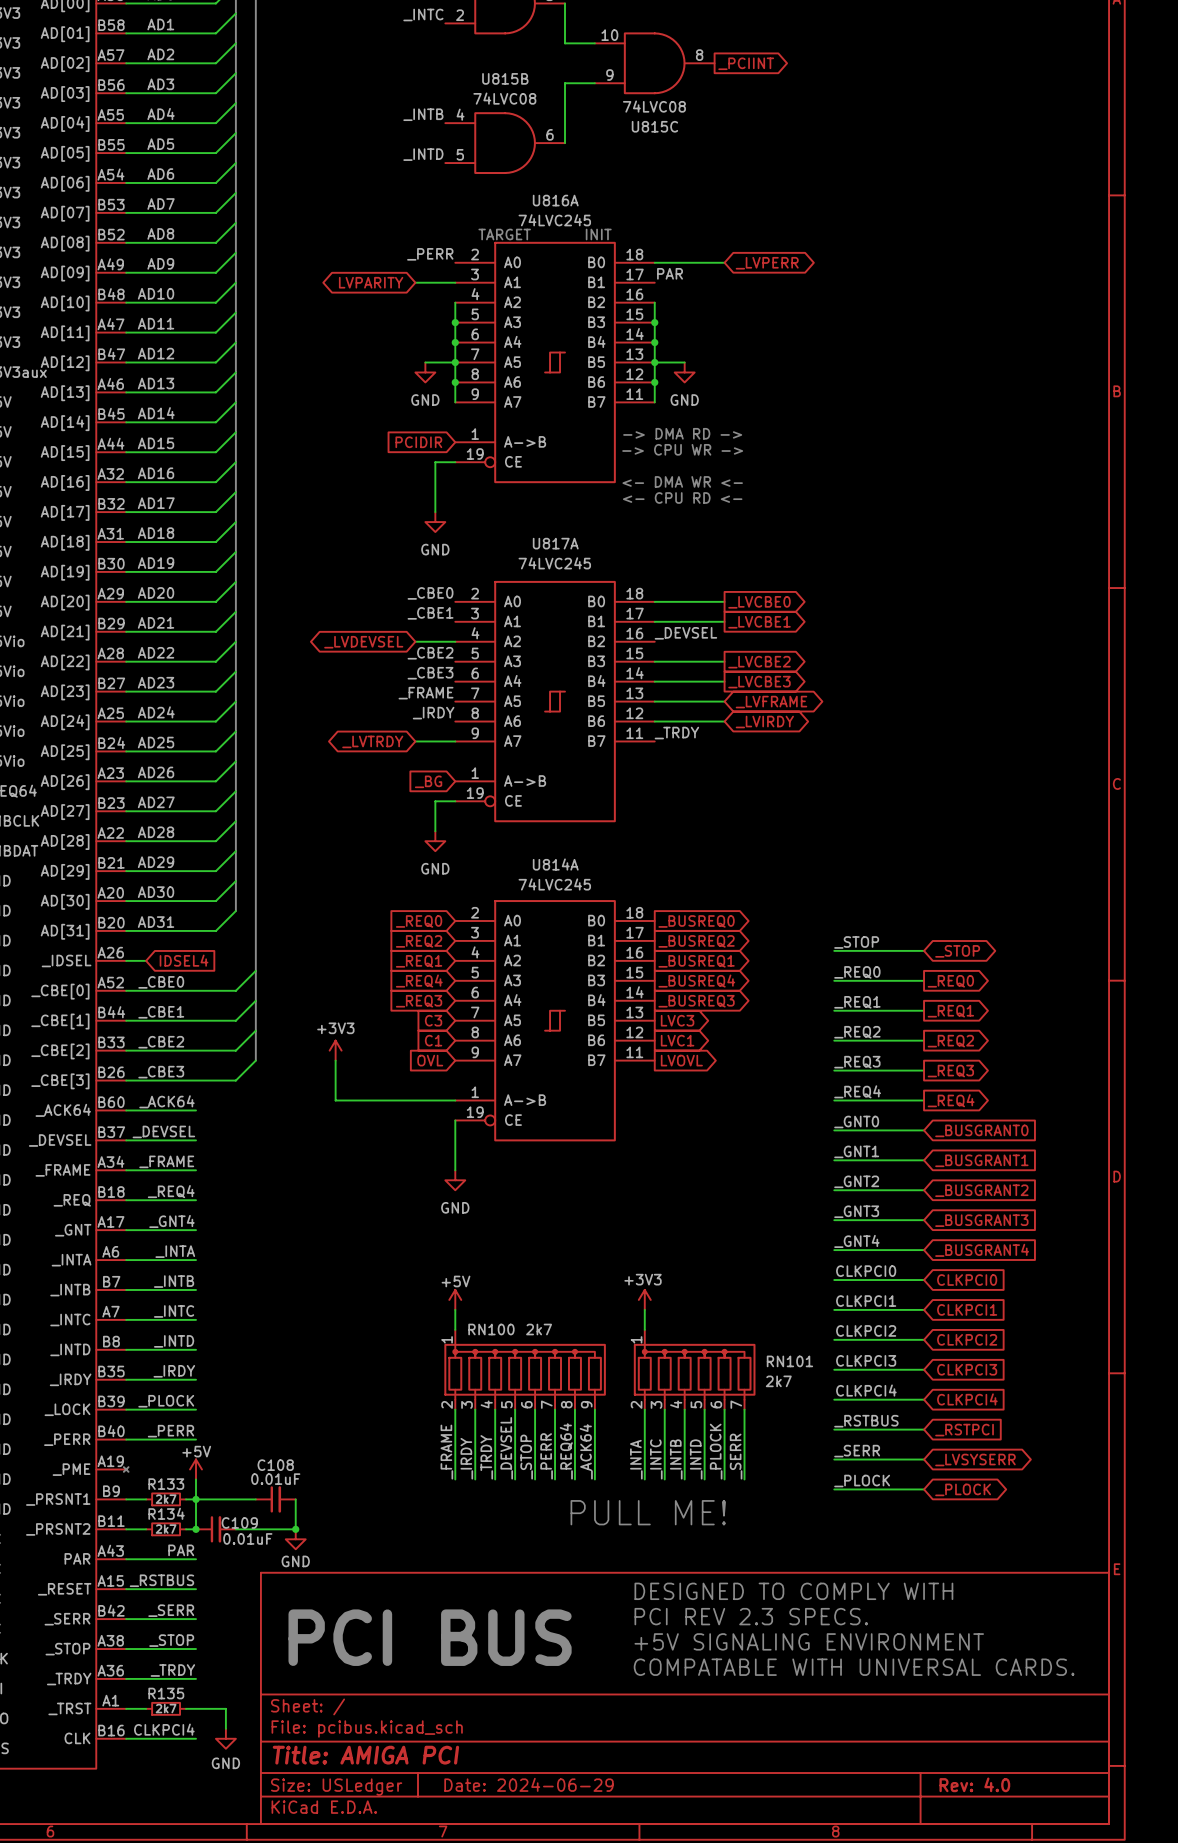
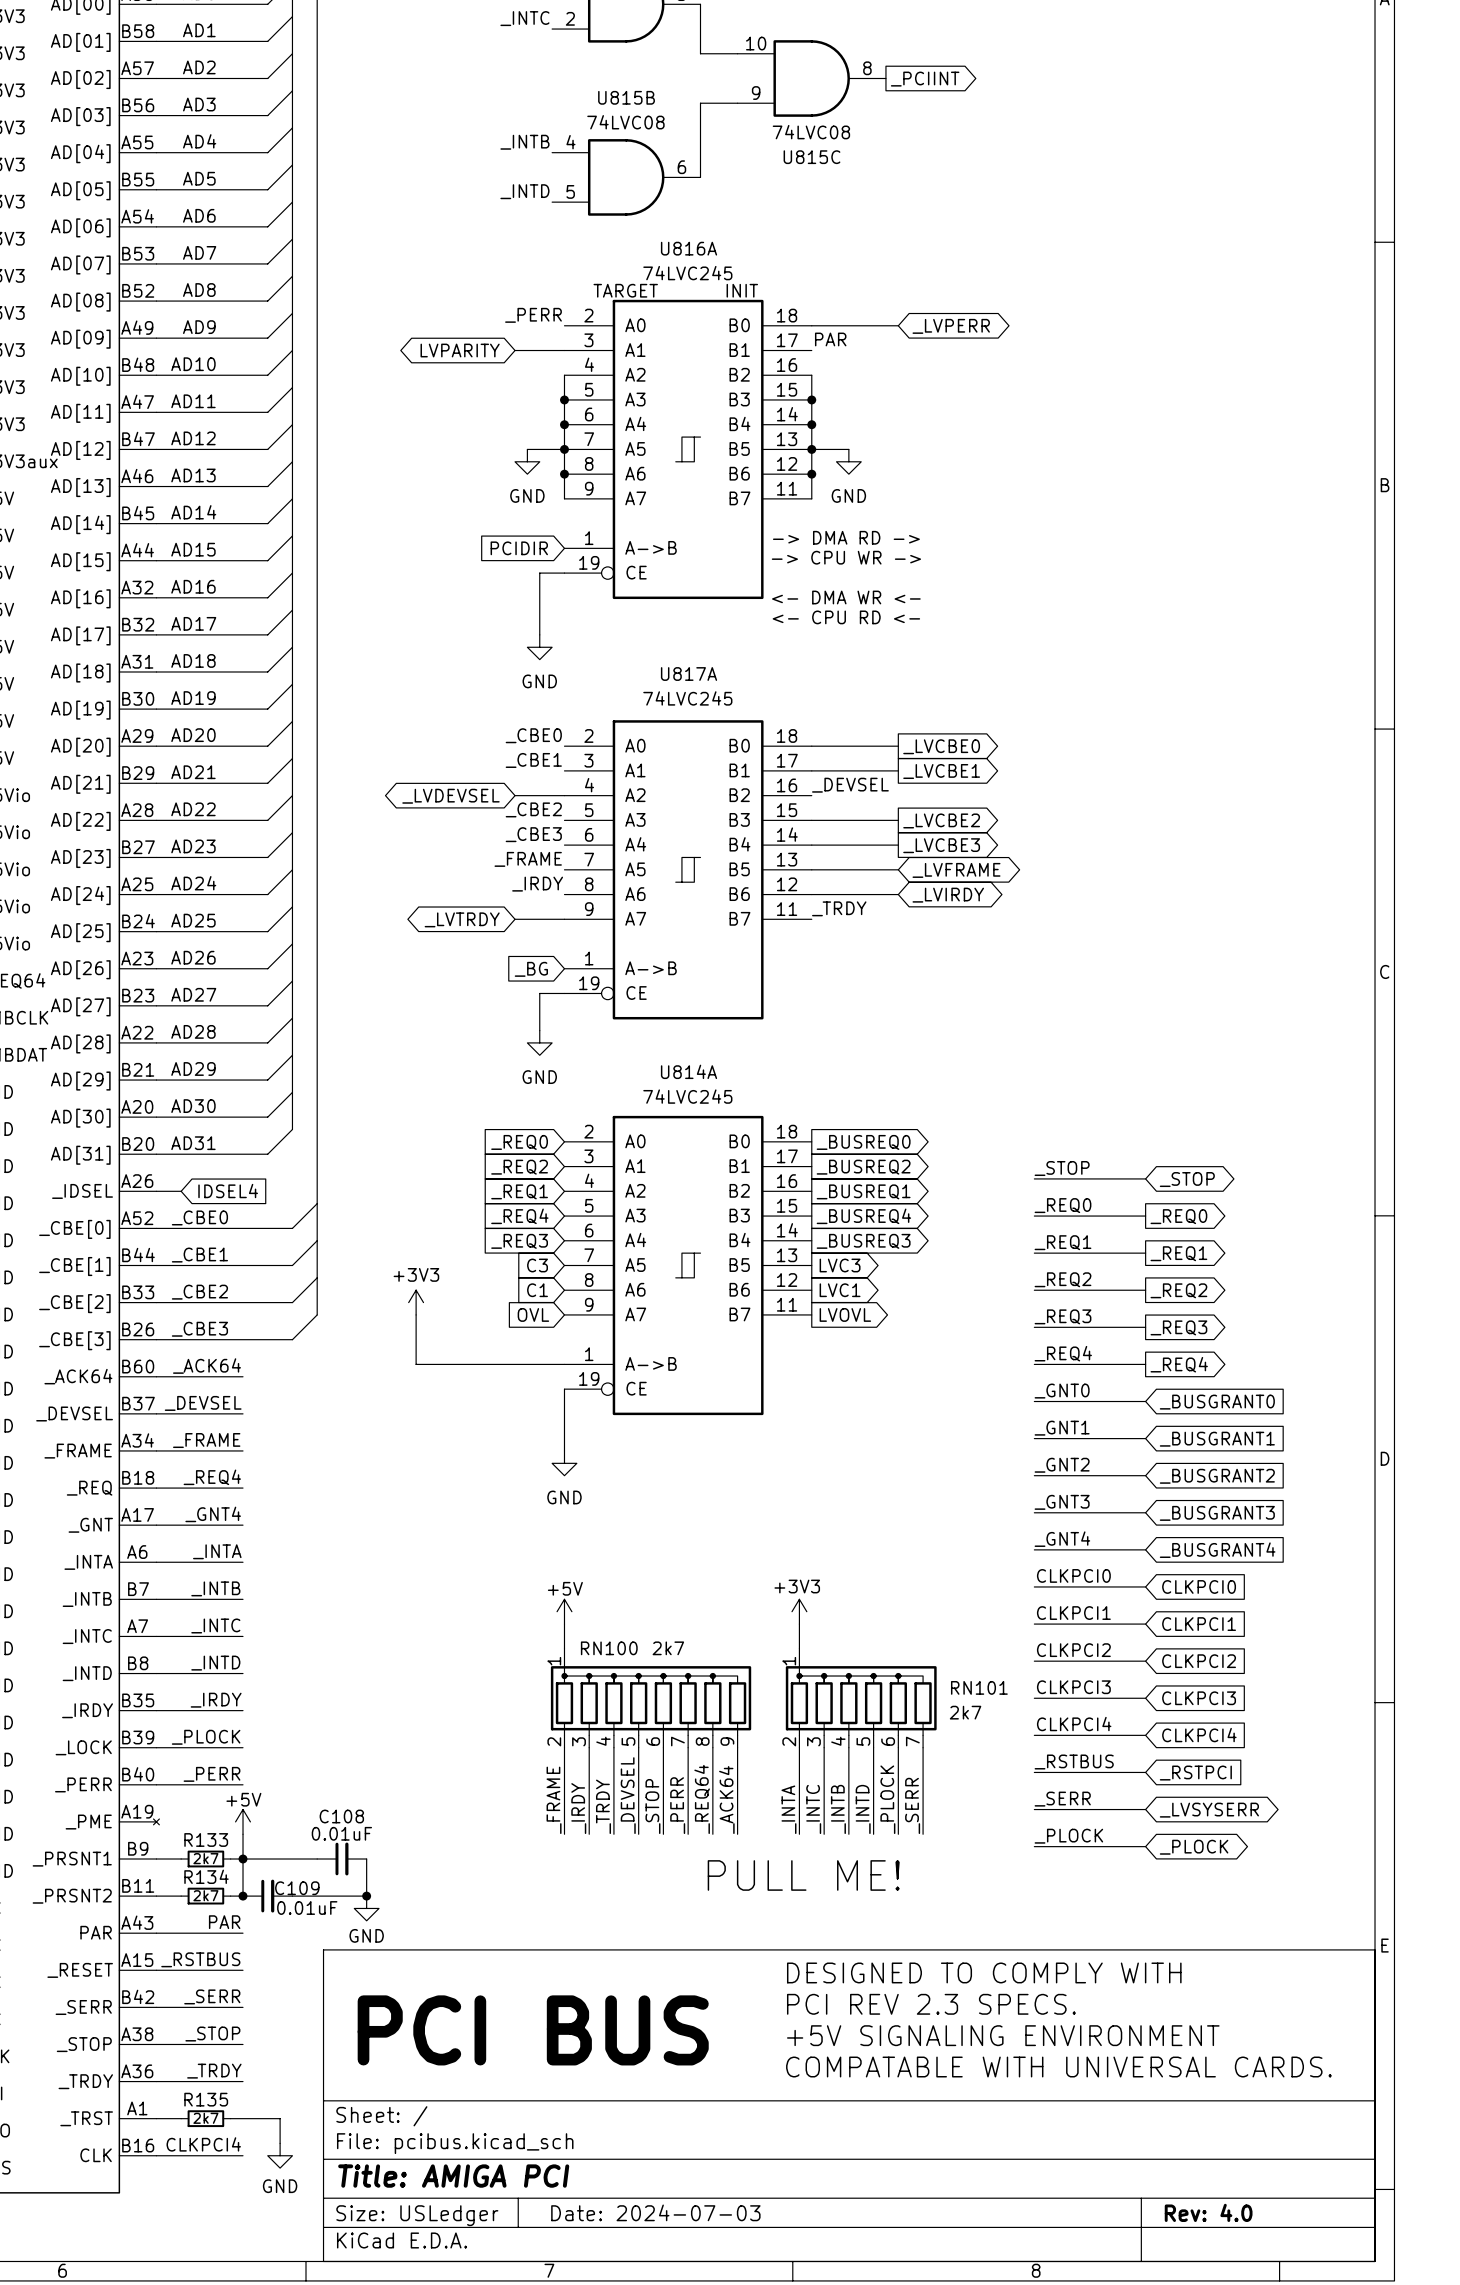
title block: Date: 2024-06-29 (529, 1784) -> Date: 2024-07-03 (655, 2212)

